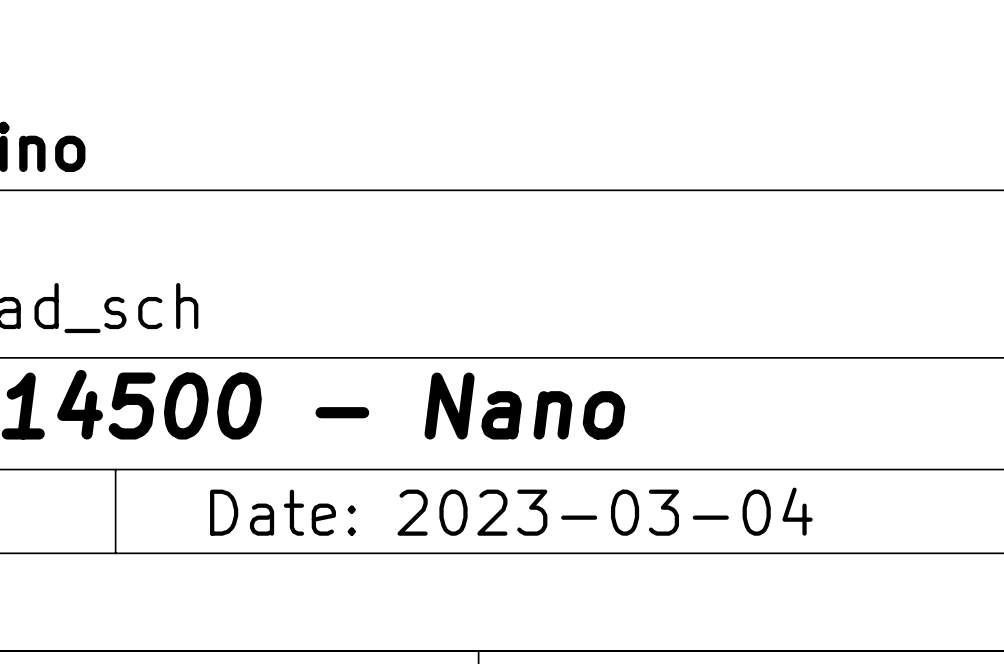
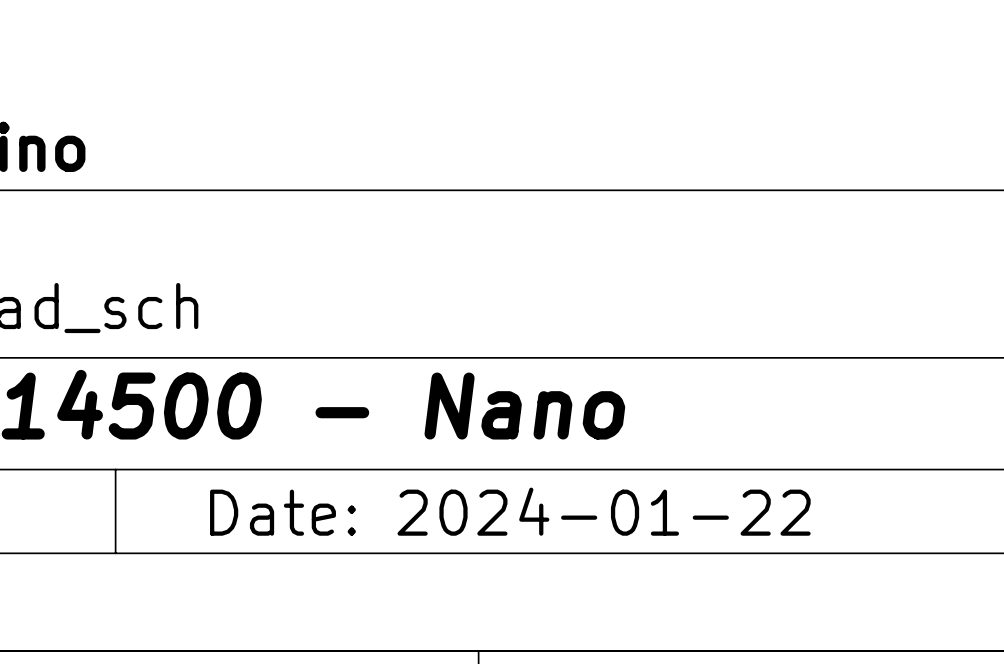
title block: Date: 2023-03-04 (511, 511) -> Date: 2024-01-22 (510, 511)

